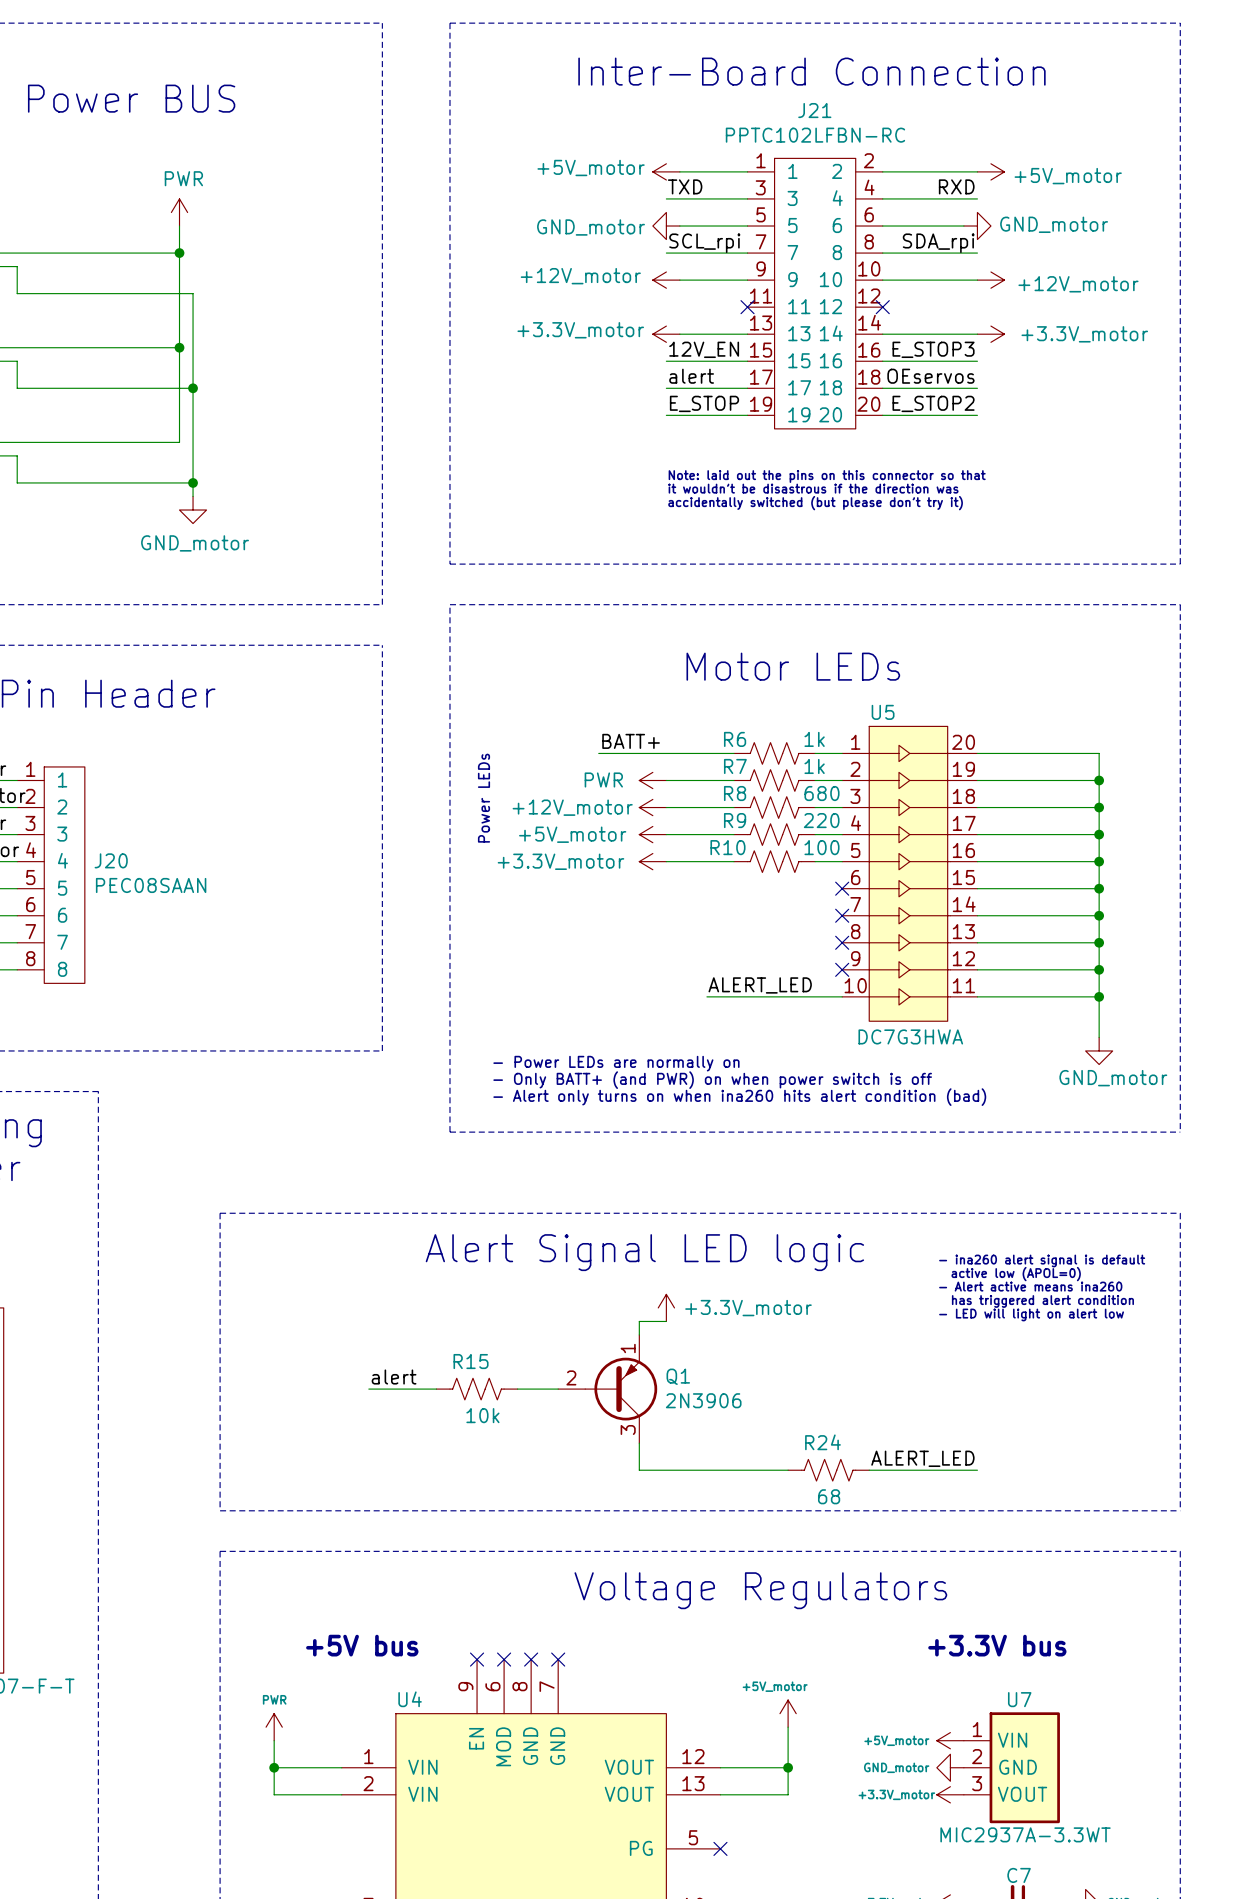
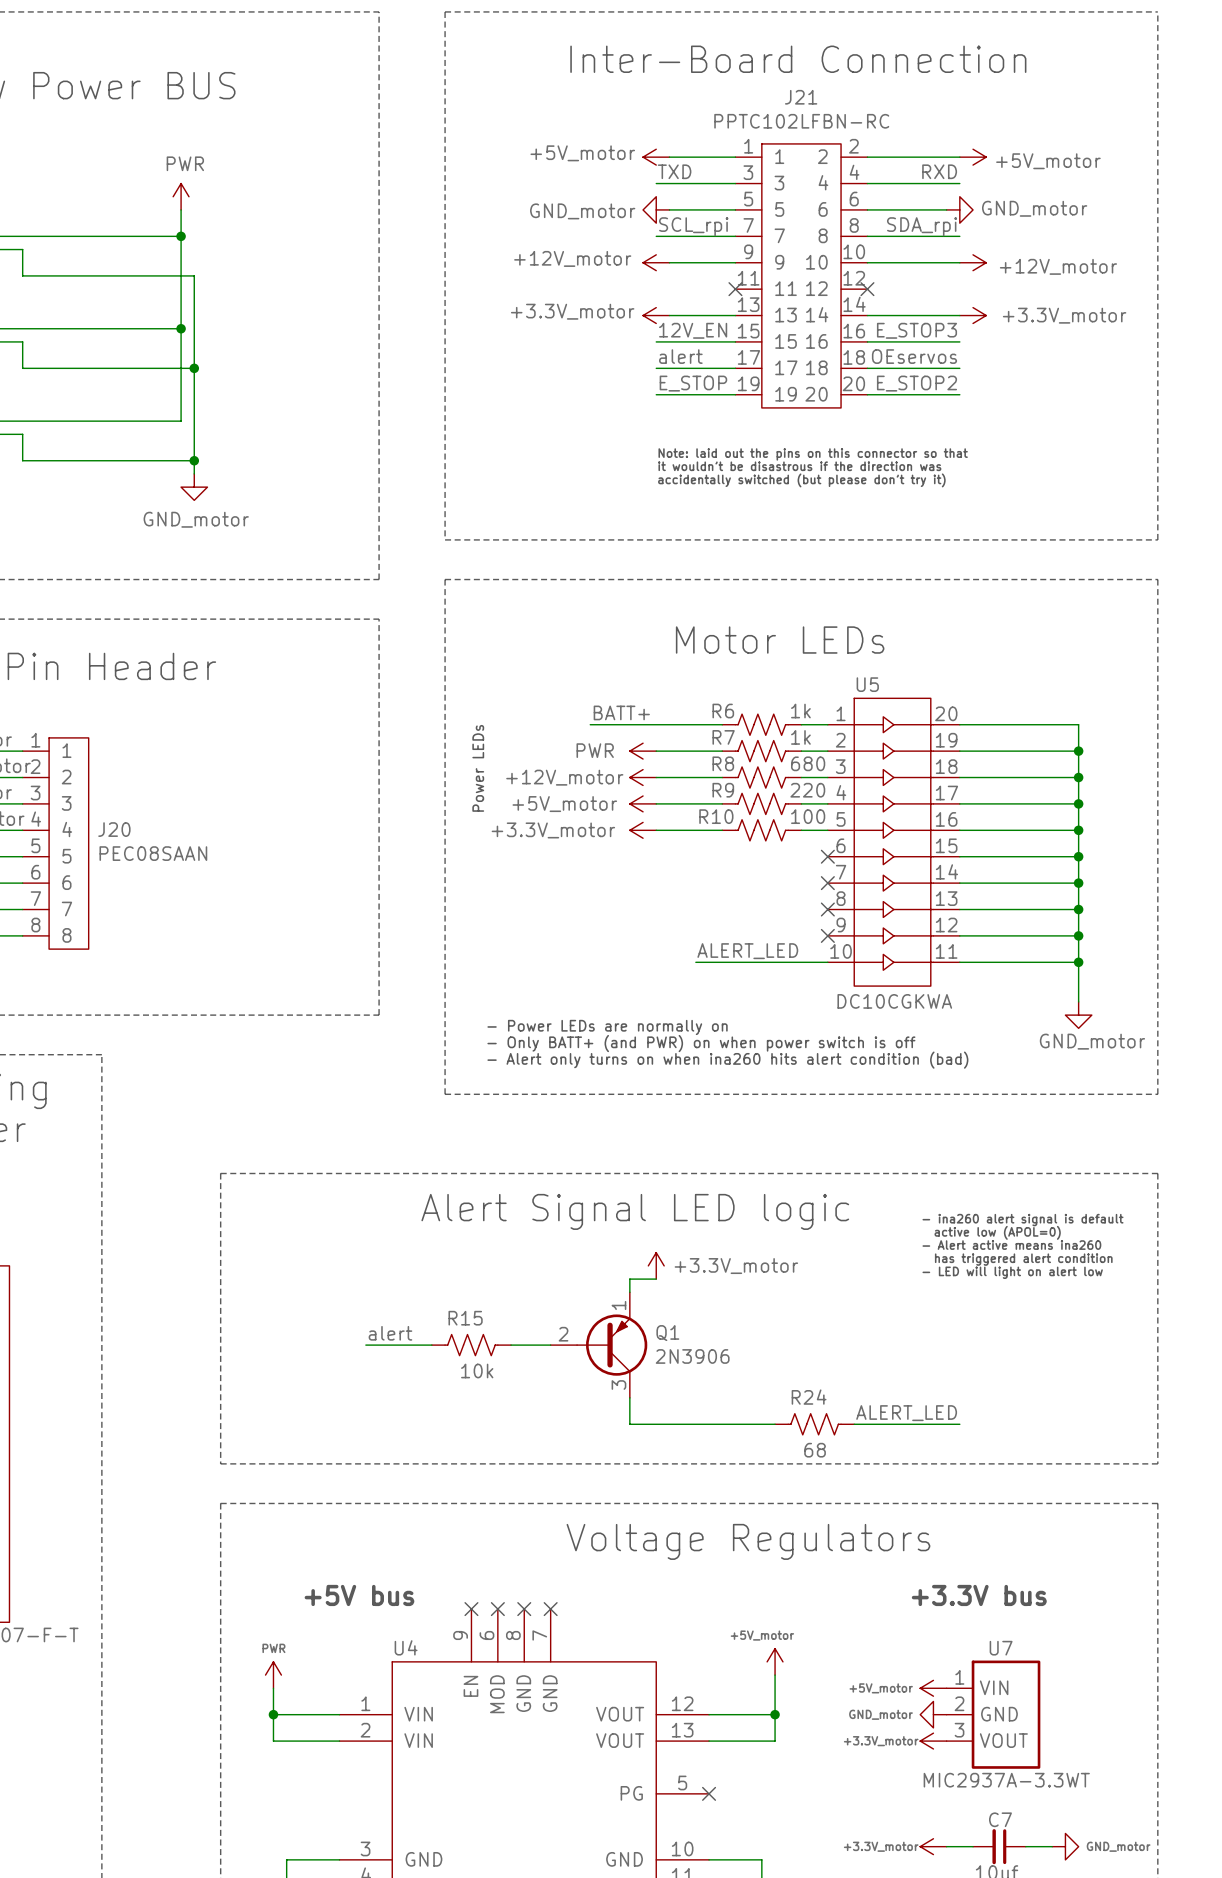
U5 value: DC7G3HWA (910, 1036) -> DC10CGKWA (894, 1001)

